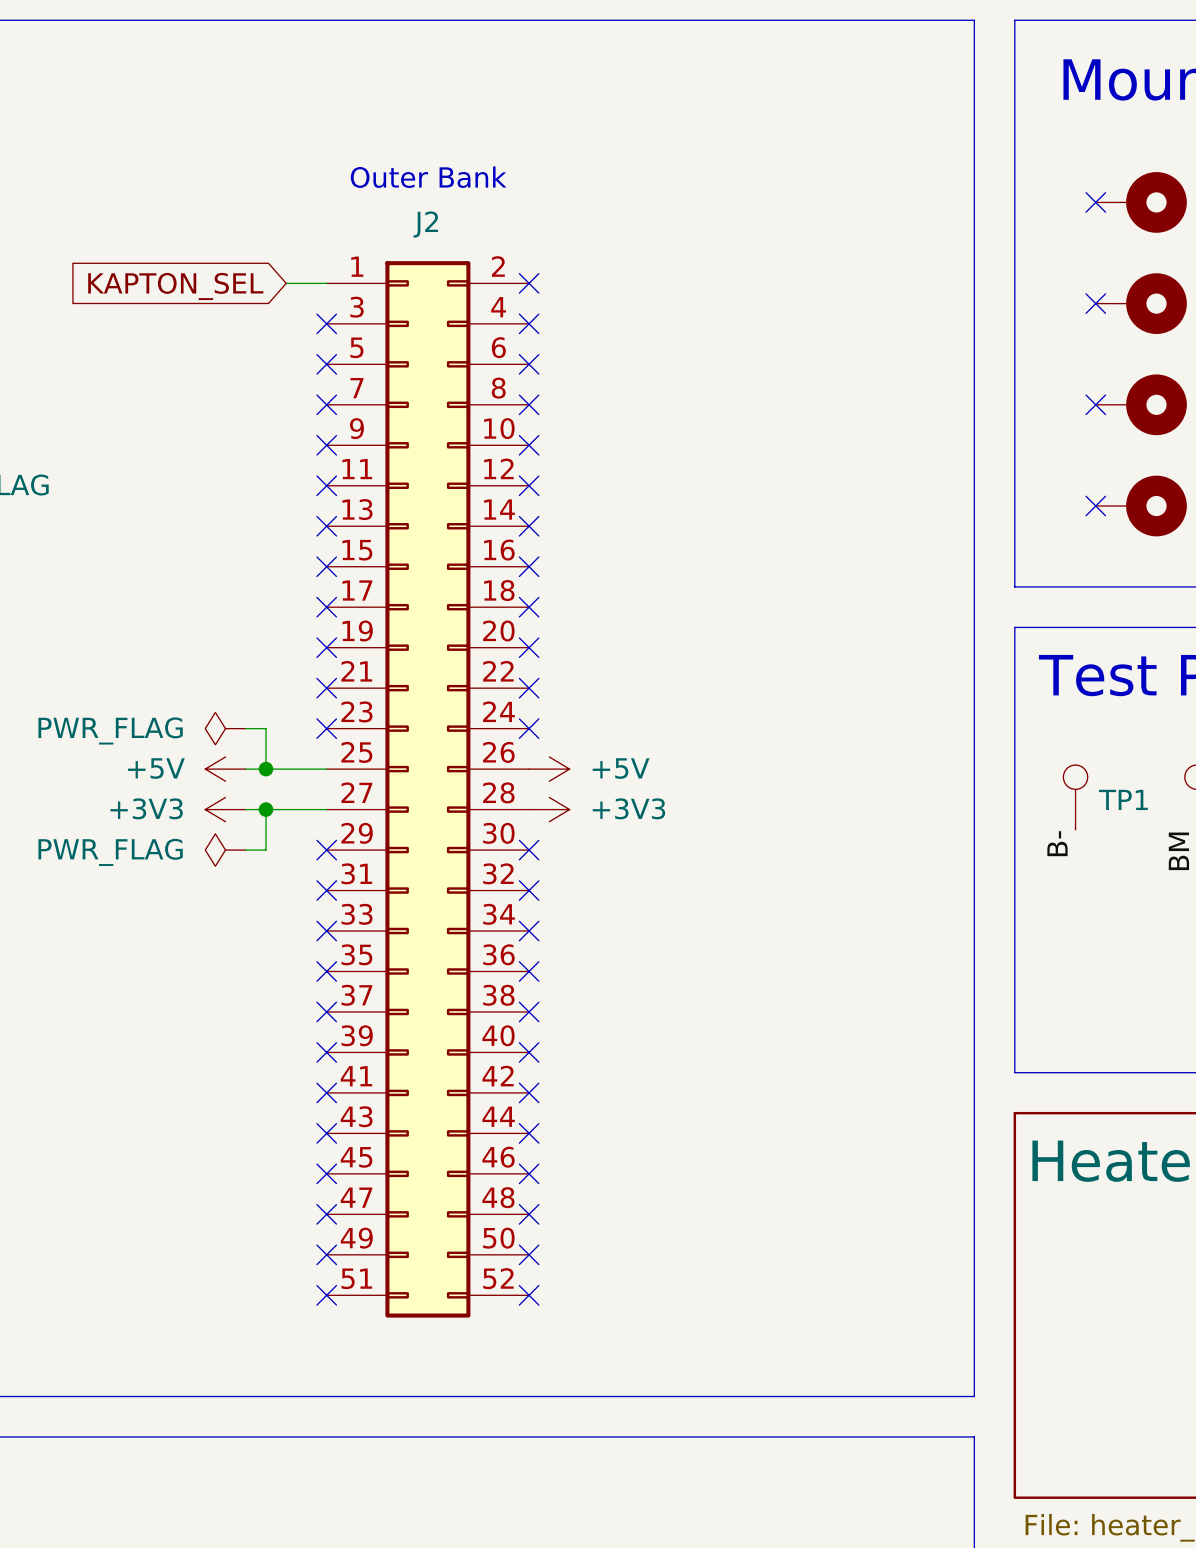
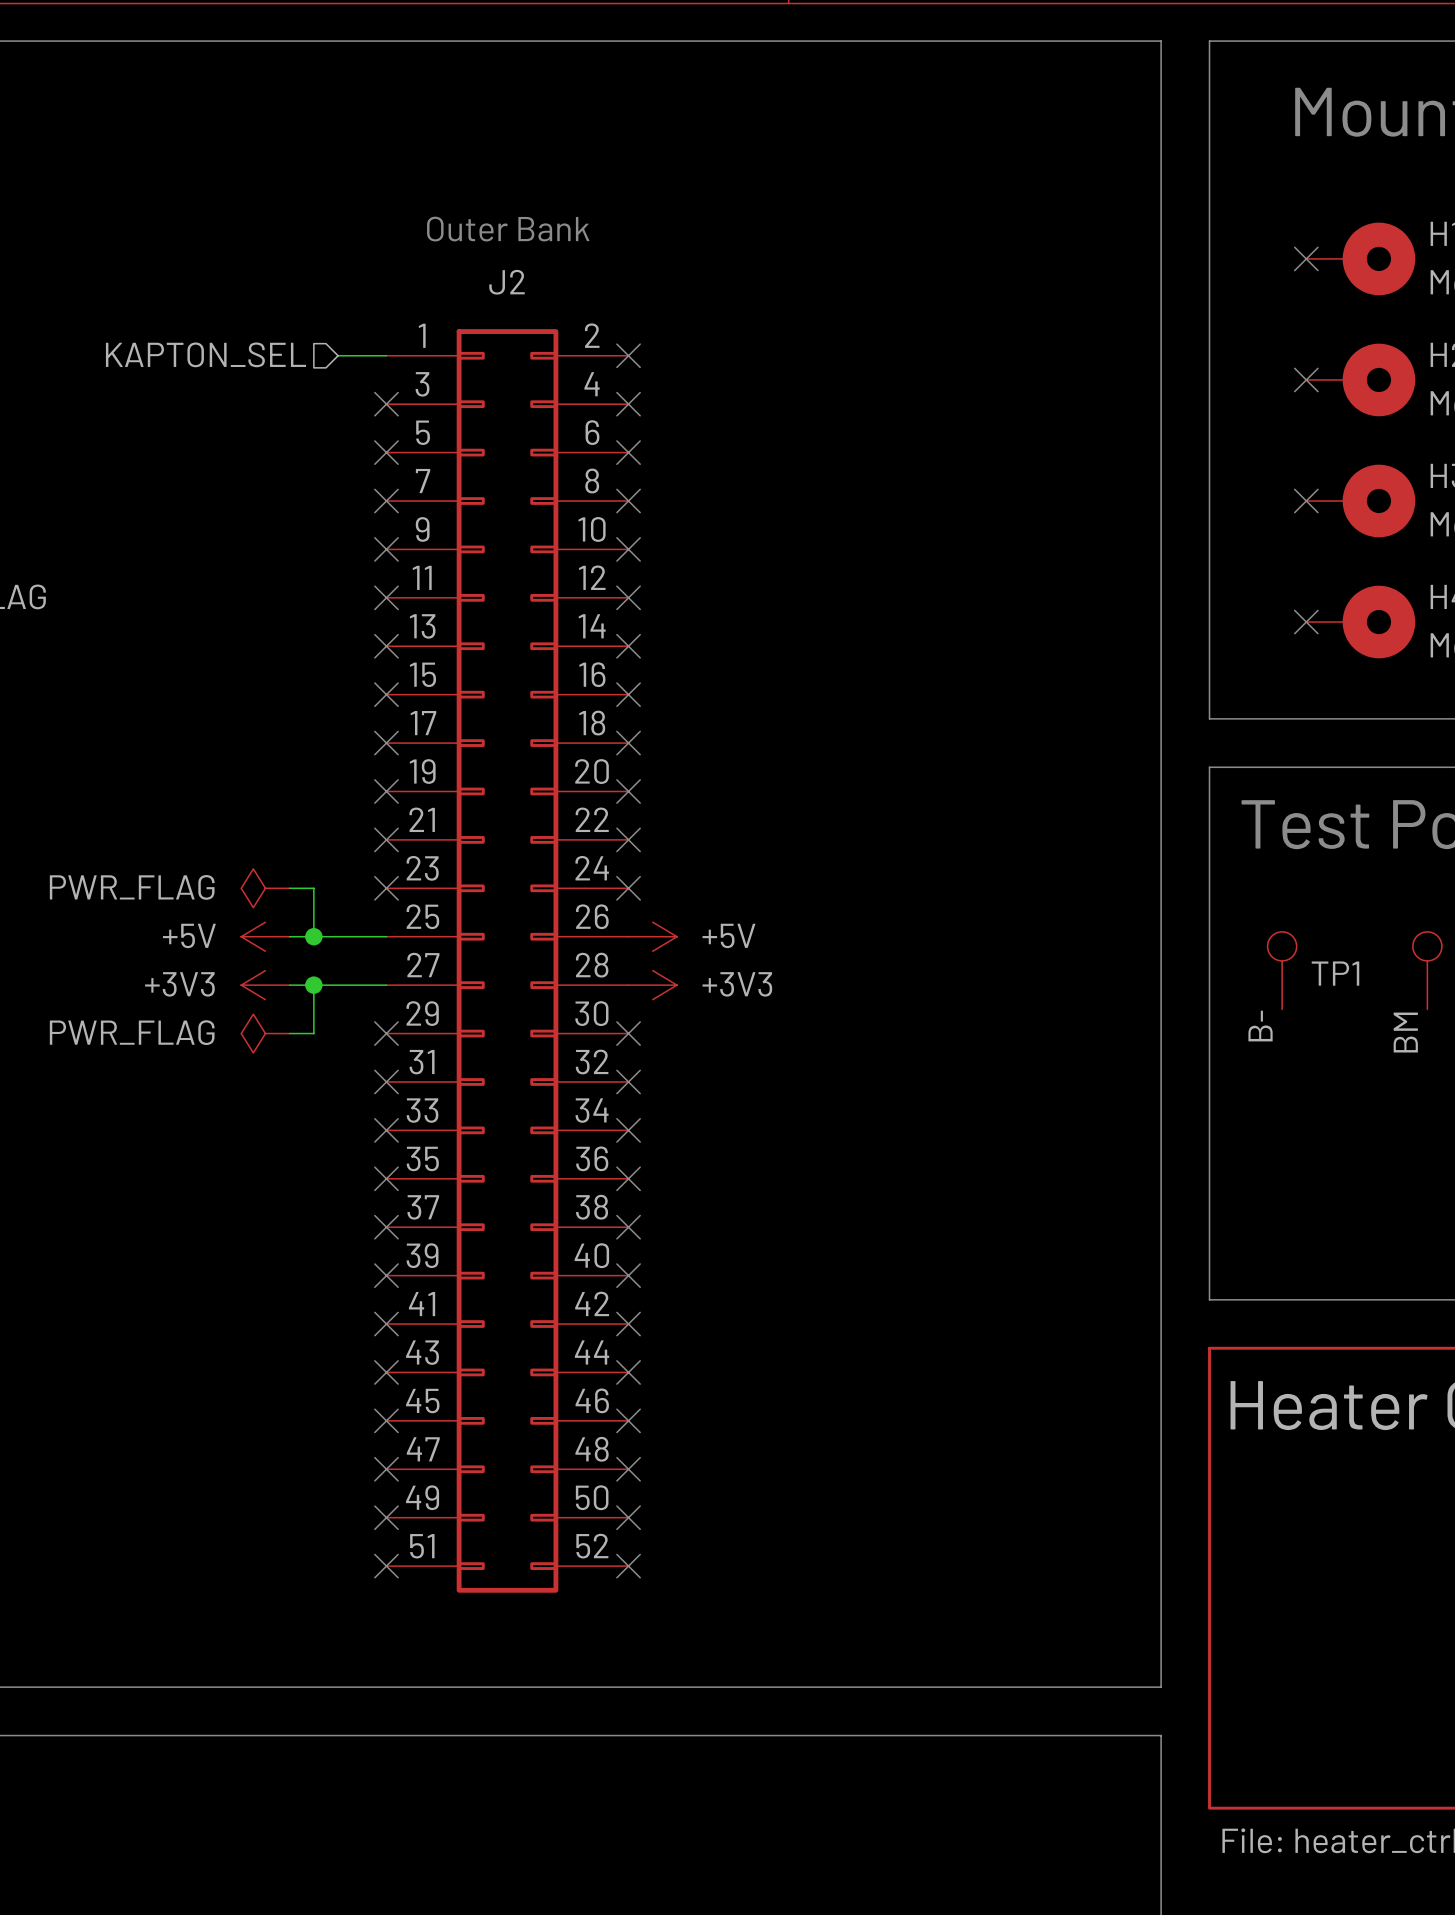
hierarchical label: none -> KAPTON_SEL (206, 354)
global label: KAPTON_SEL (175, 286) -> none

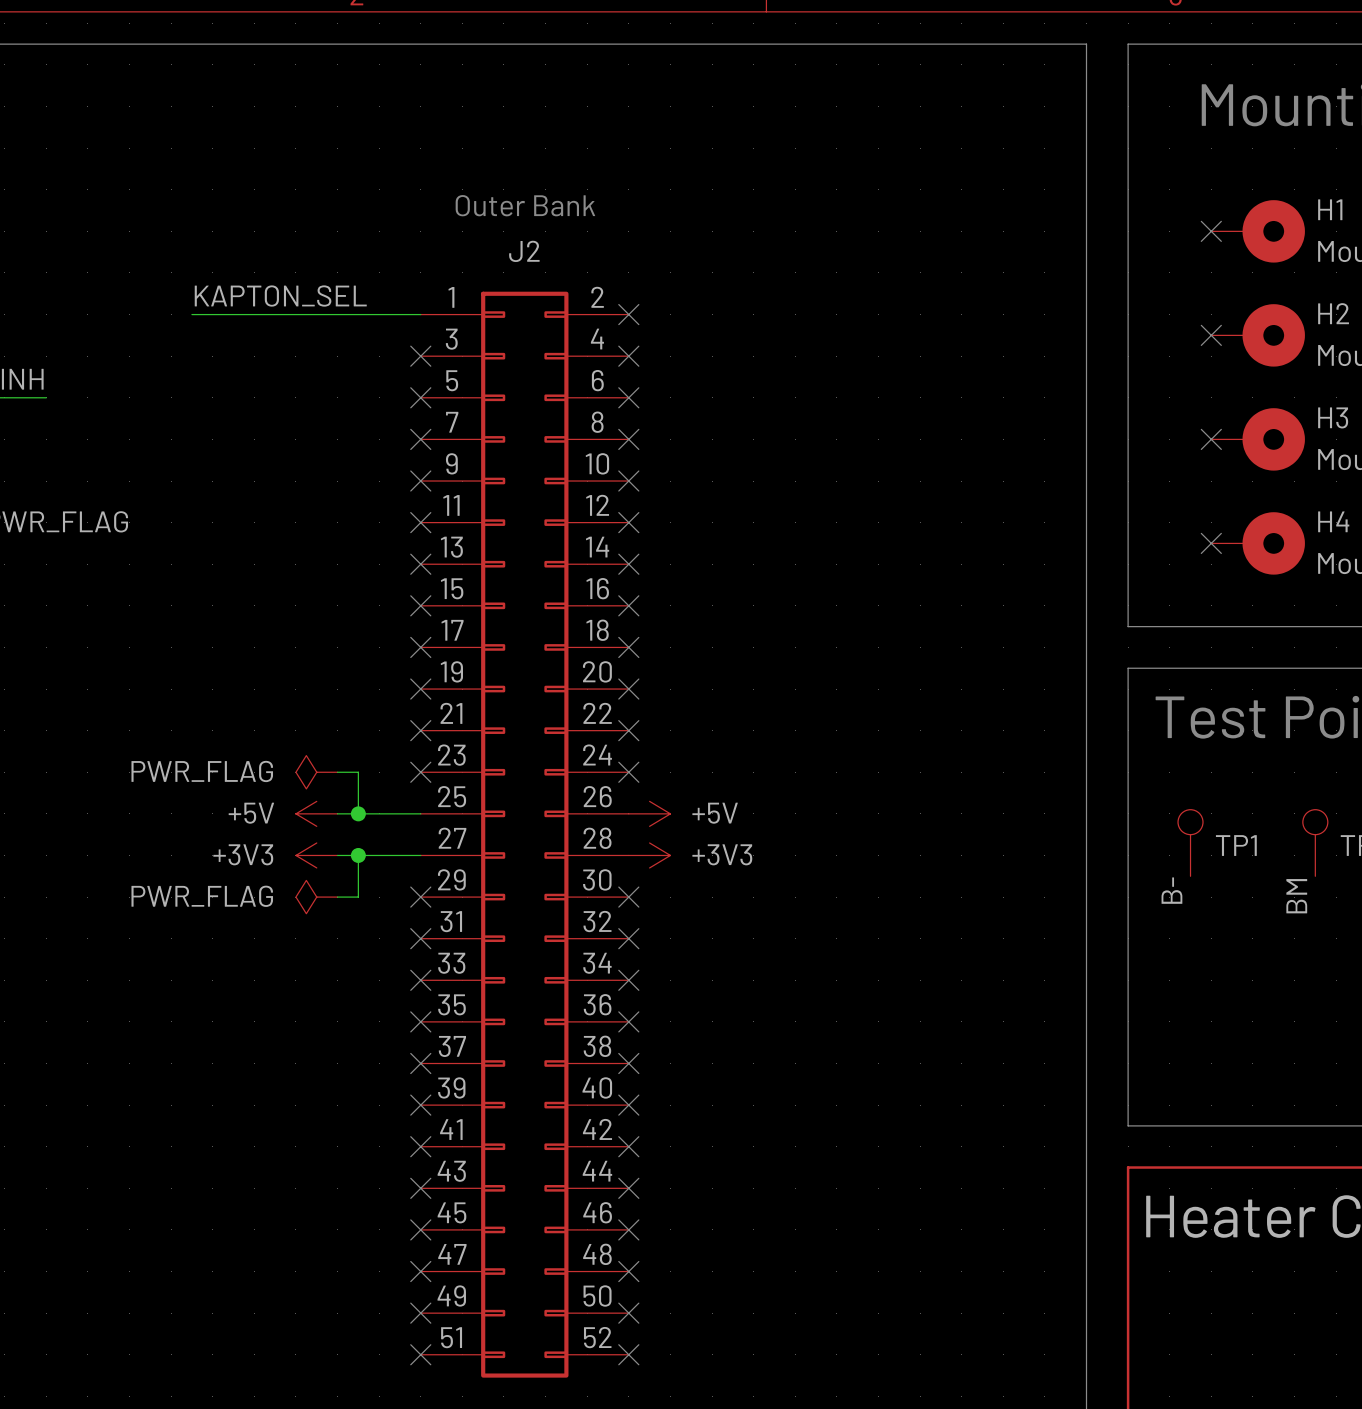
label: none -> KAPTON_SEL (280, 296)
hierarchical label: KAPTON_SEL (206, 354) -> none
wire: none -> (191, 314) (379, 314)

